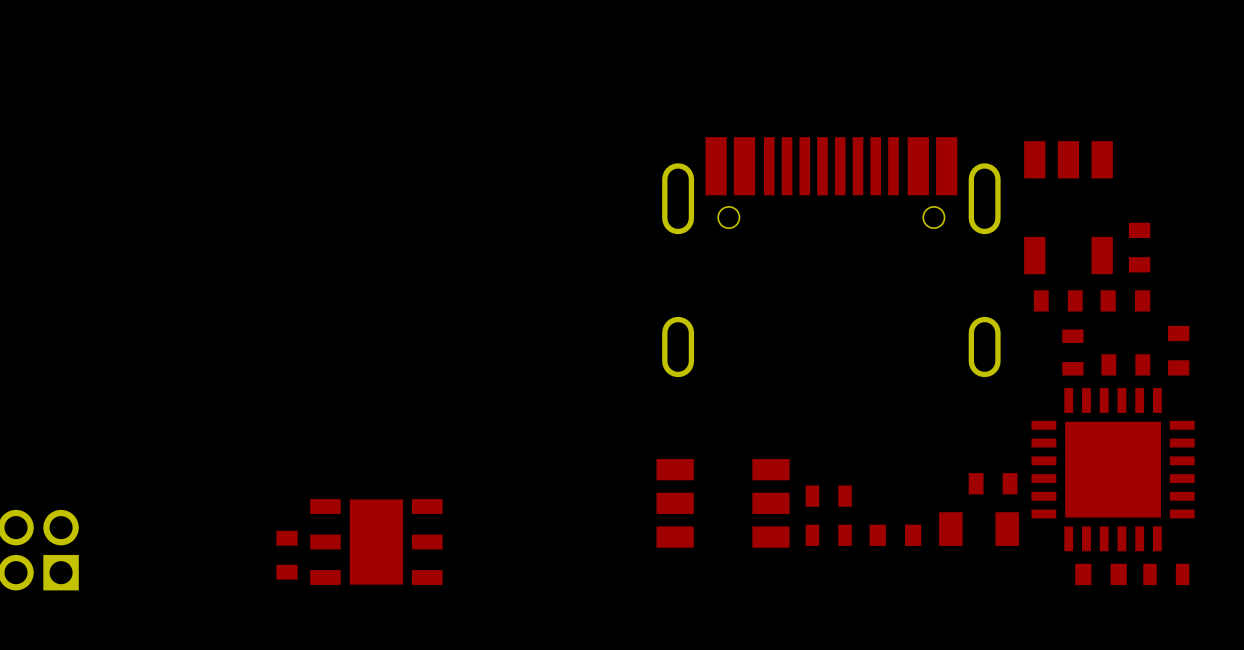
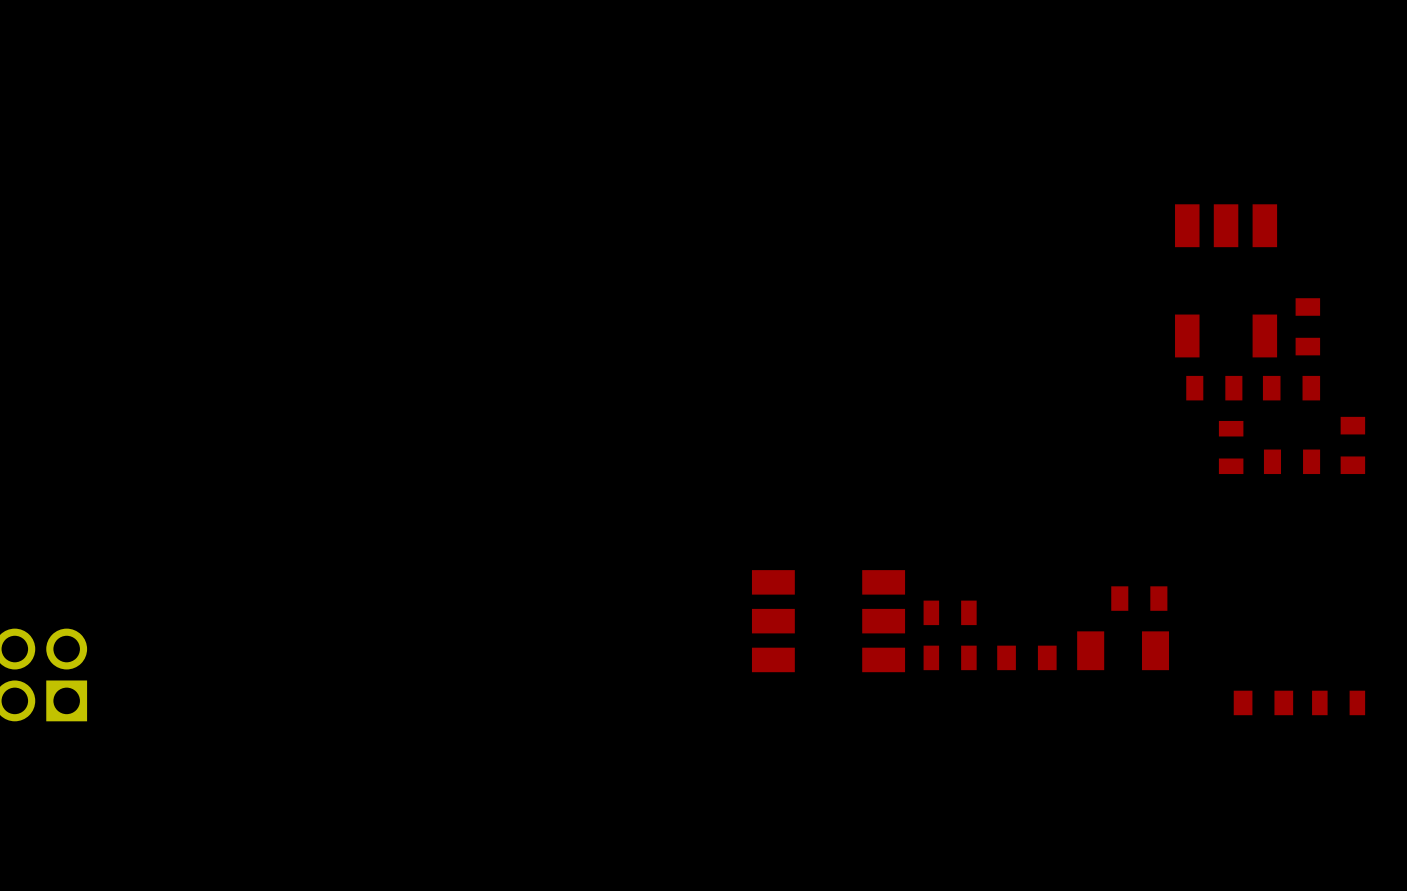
part: (831, 257) -> none
part: (1113, 469) -> none
part: (376, 542) -> none
part: (287, 555) -> none

